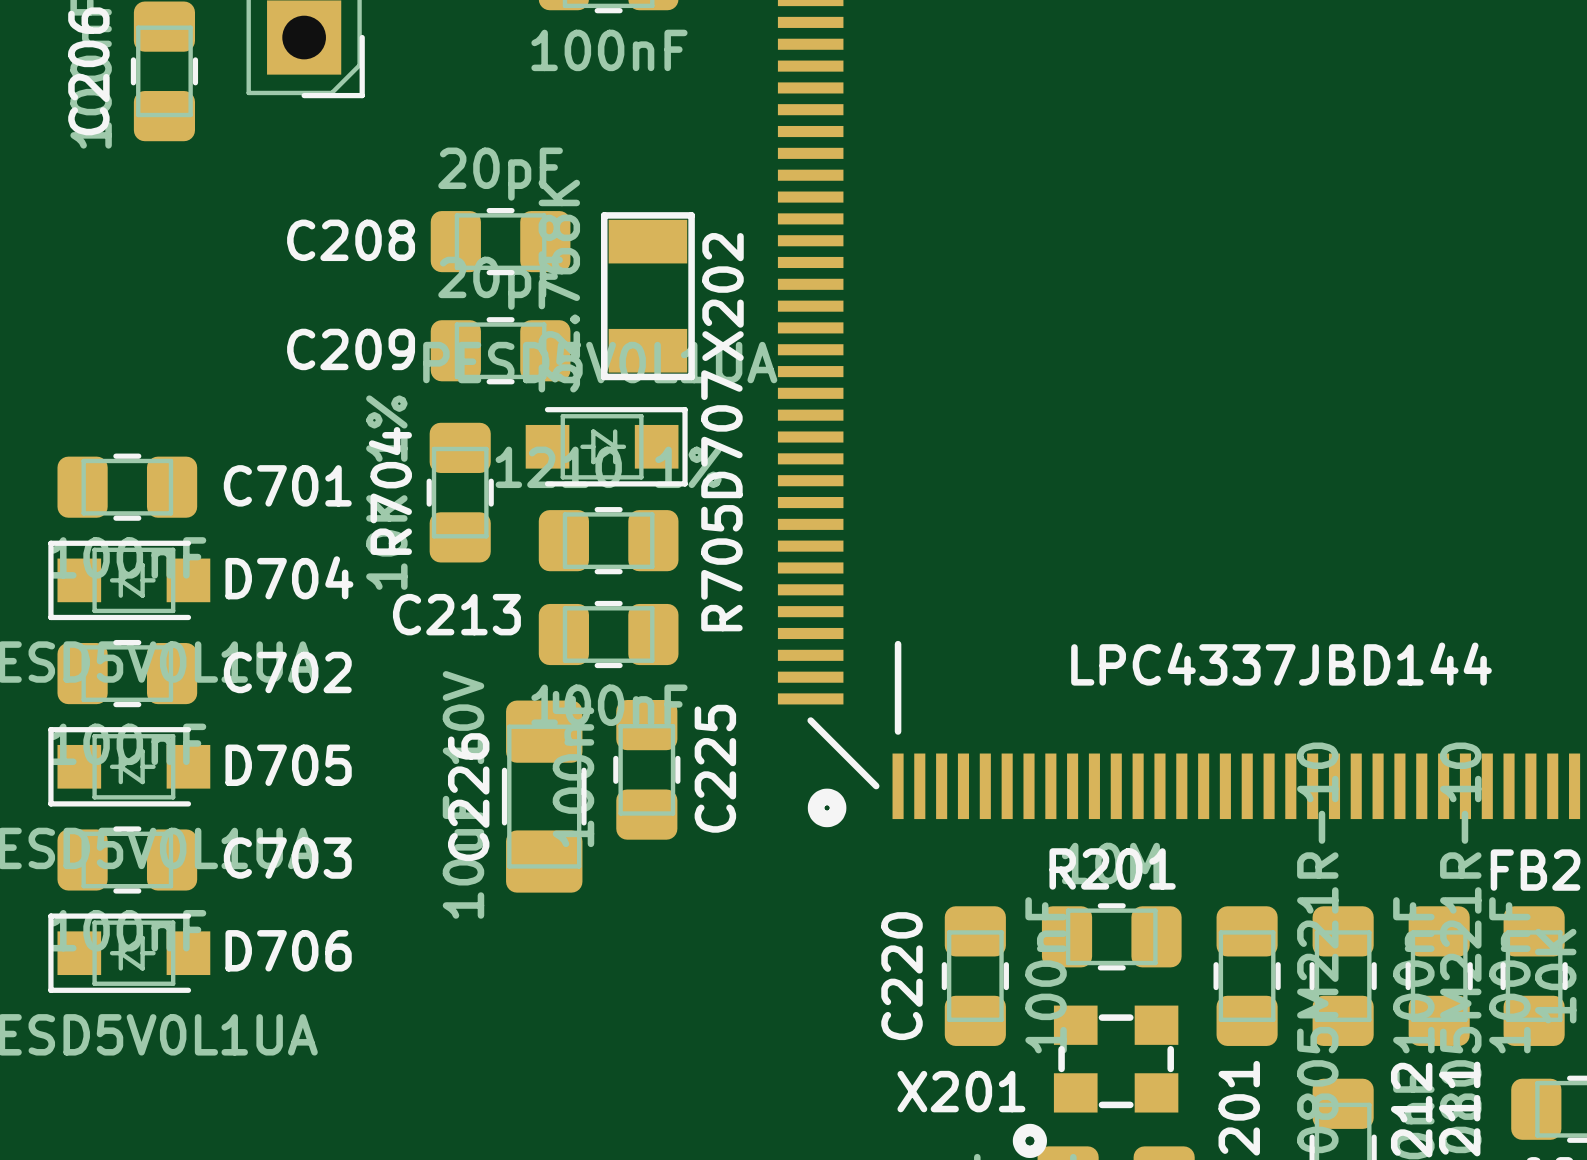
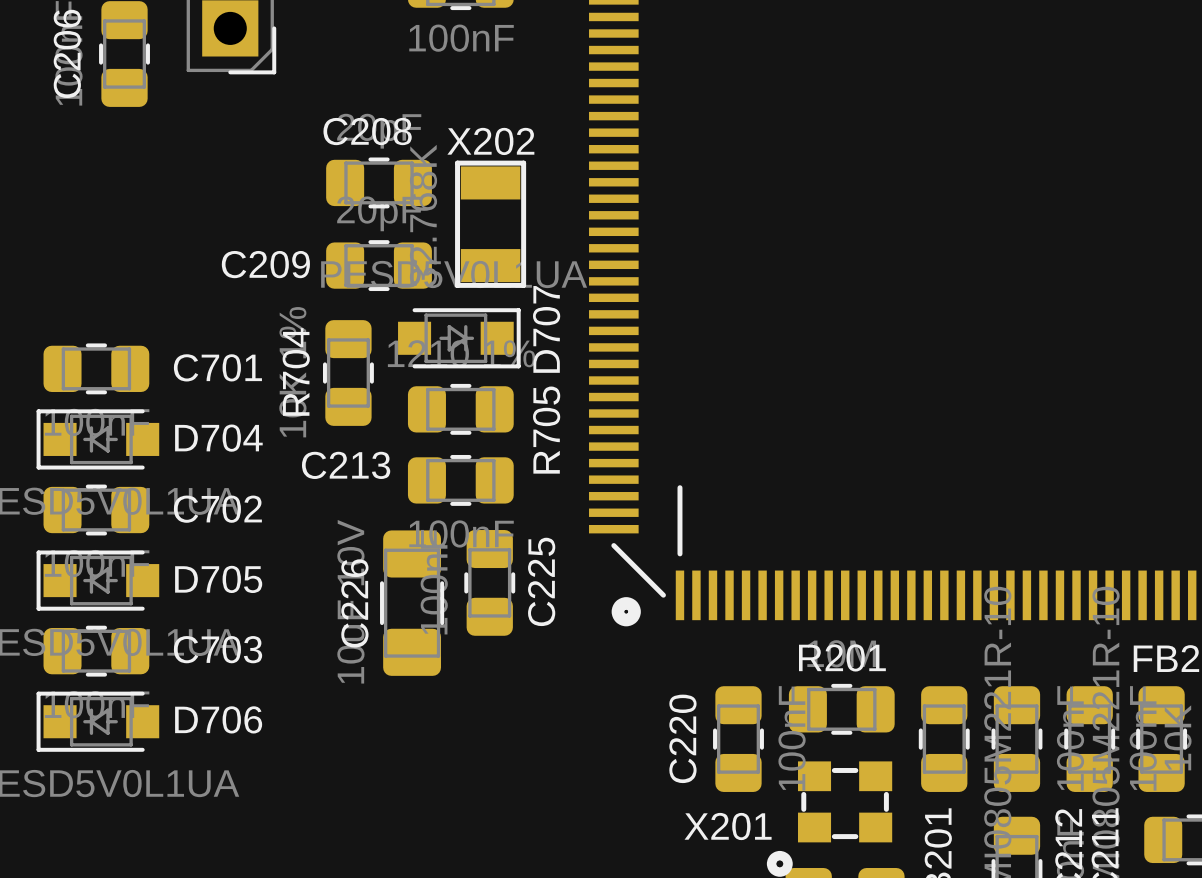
C208 name position: C208 (351, 240) -> C208 (367, 131)
X202 name rotation: 0° (723, 297) -> 90° clockwise (490, 141)
part value: LPC4337JBD144 (1281, 664) -> none

